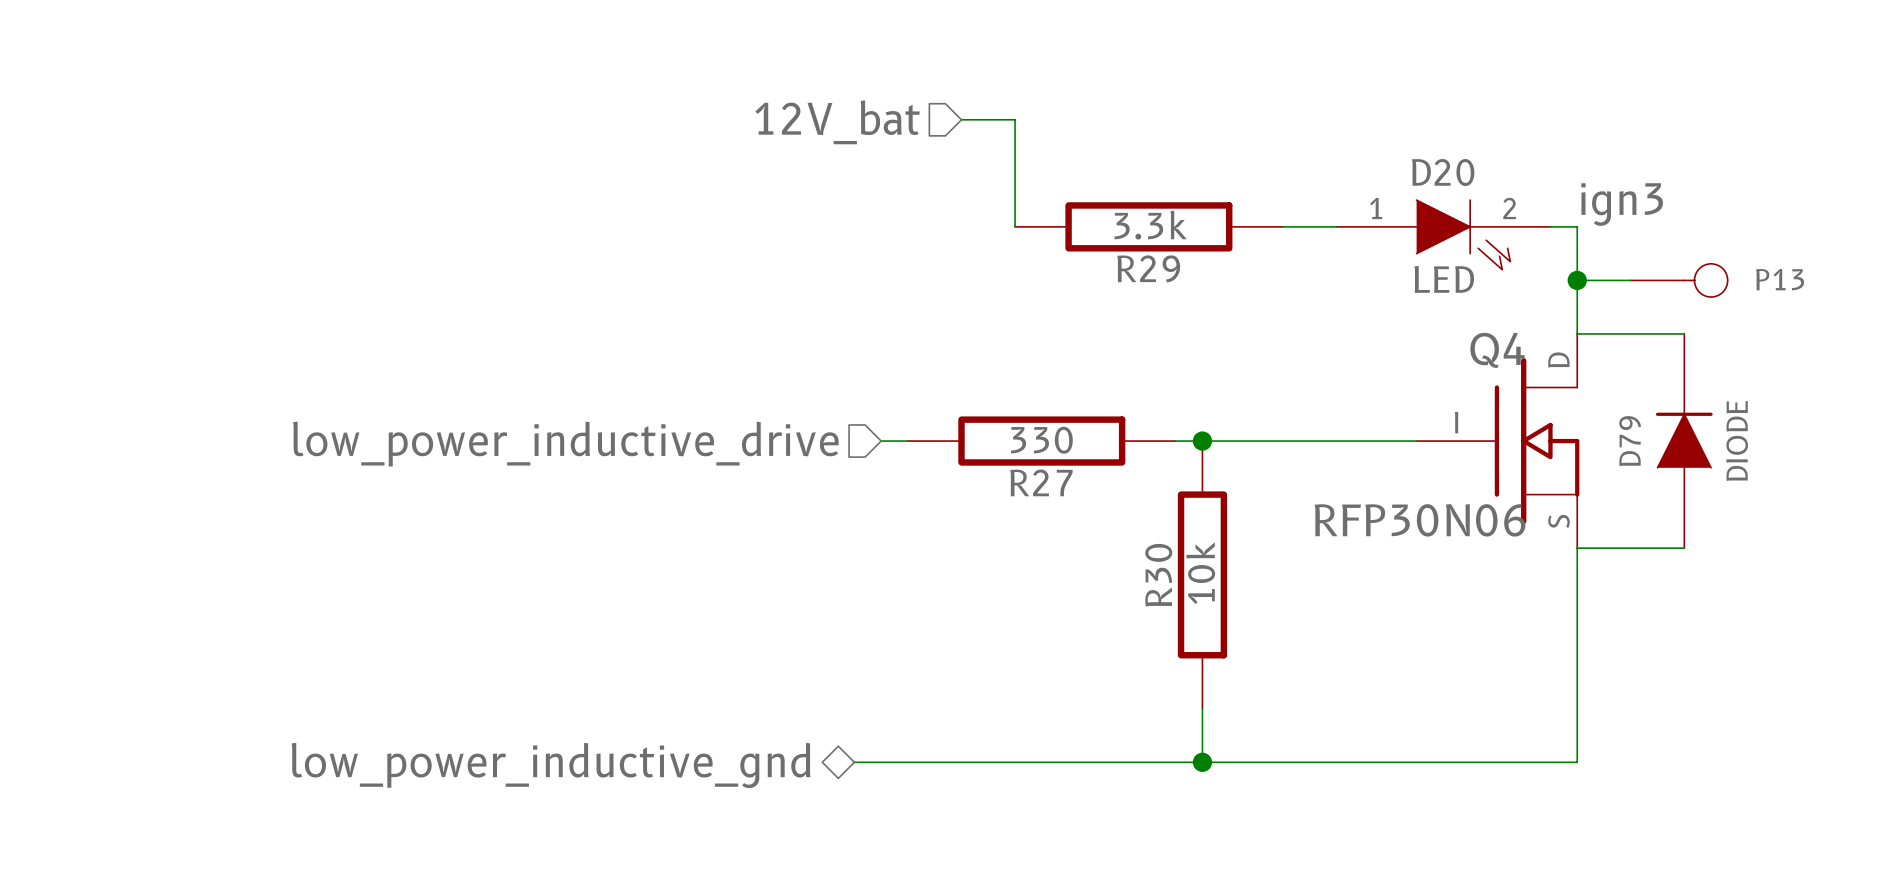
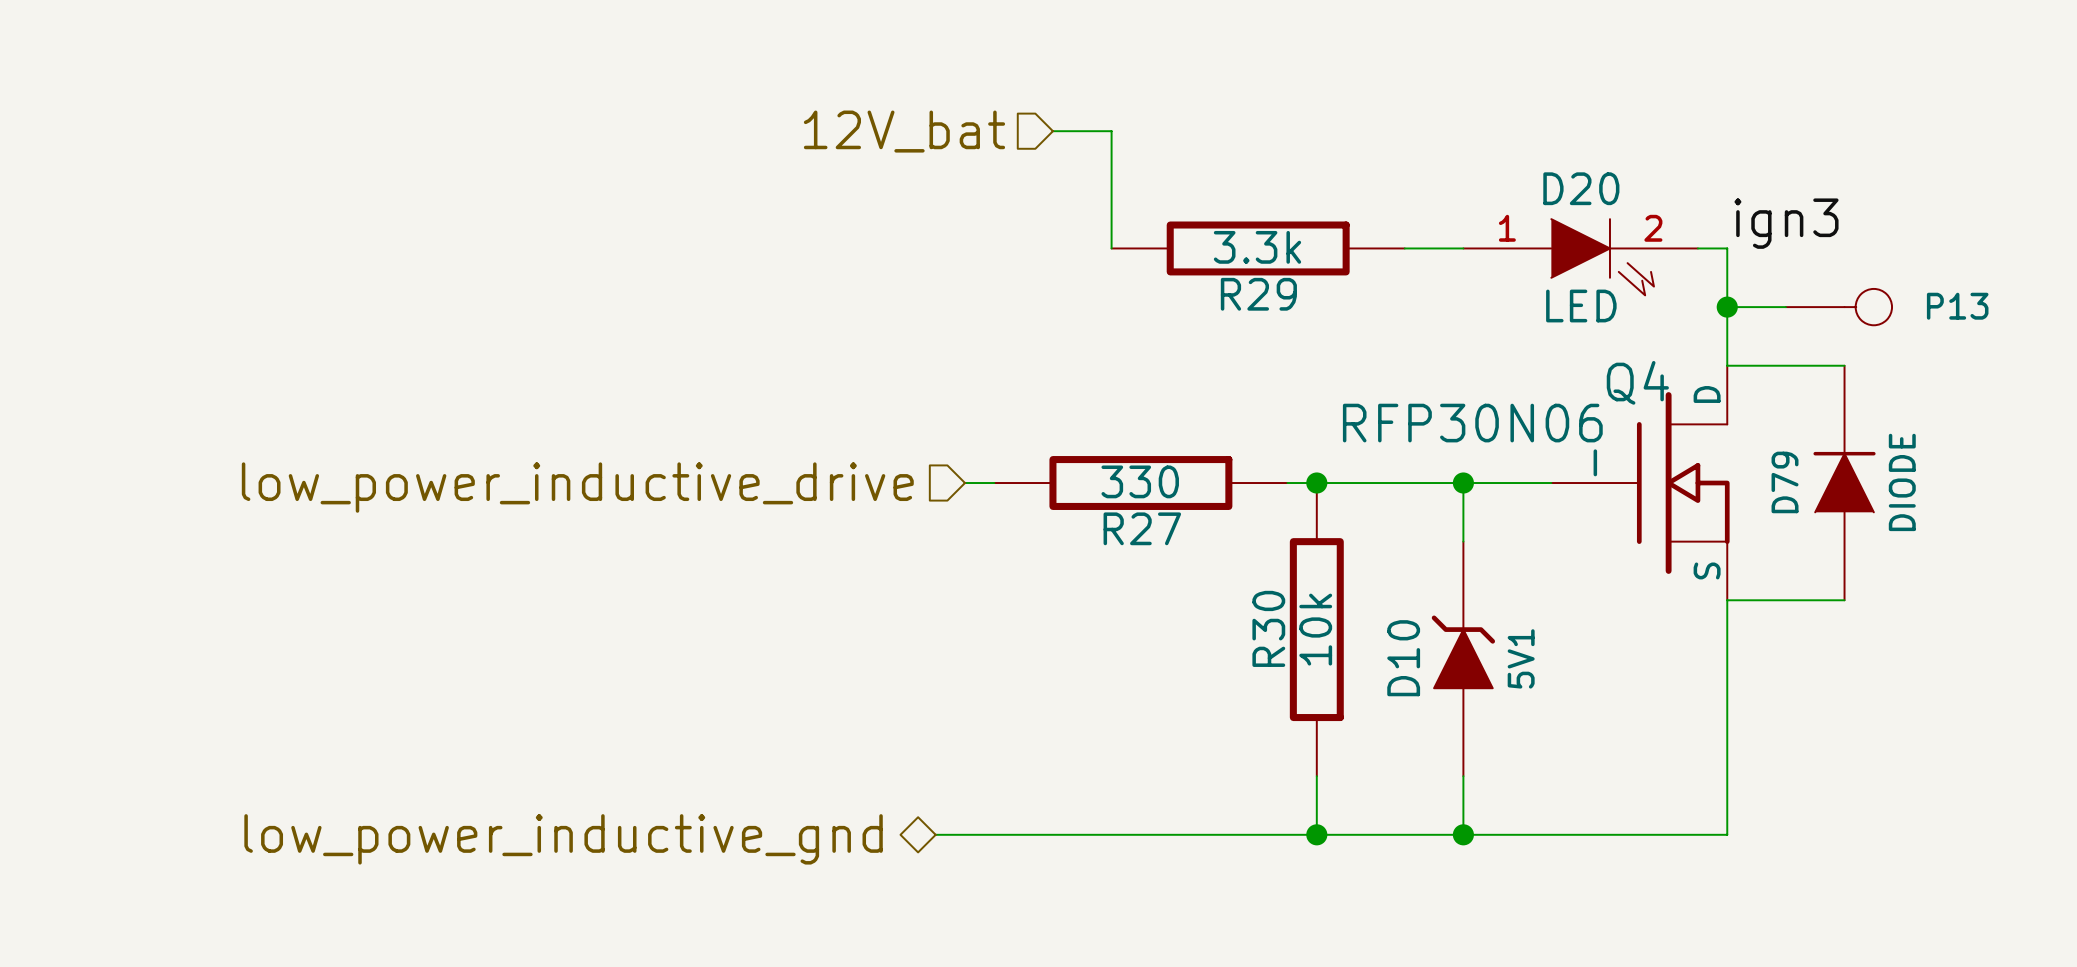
wire: none -> (1463, 483) (1463, 541)
junction: none -> (1463, 483)
Q4 value position: RFP30N06 (1420, 520) -> RFP30N06 (1472, 423)
D10: none -> 5V1 (1463, 658)
wire: none -> (1463, 776) (1463, 834)
junction: none -> (1463, 834)

